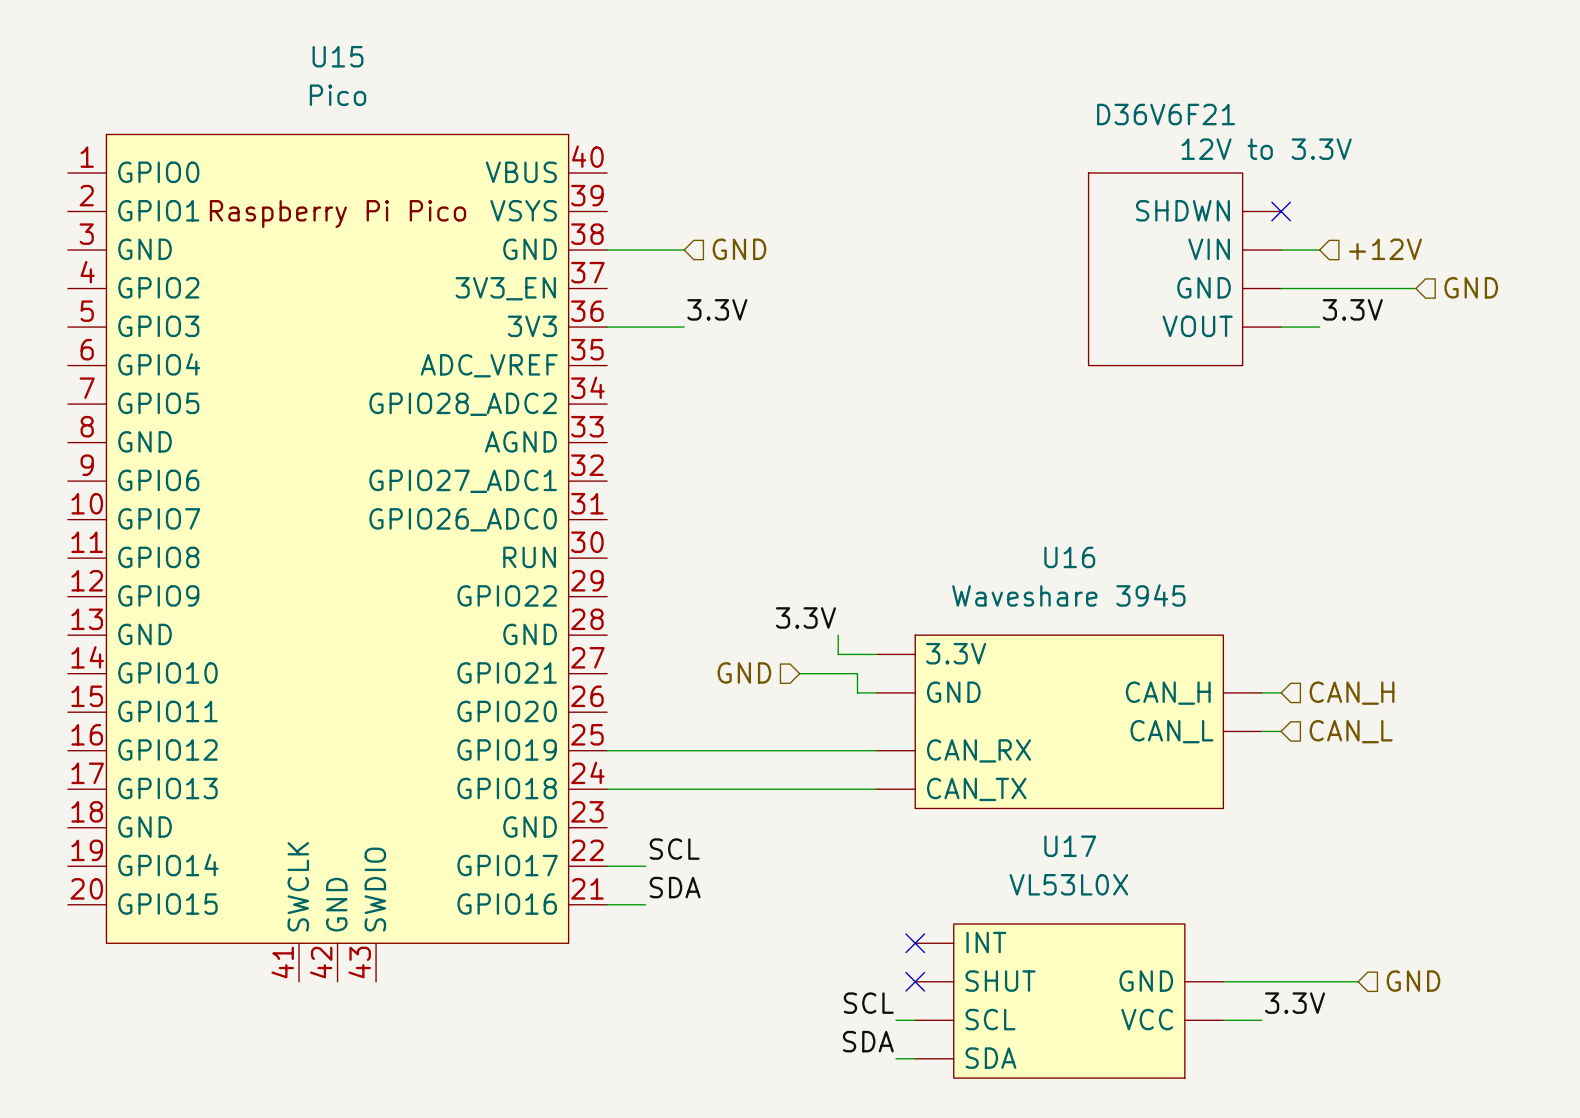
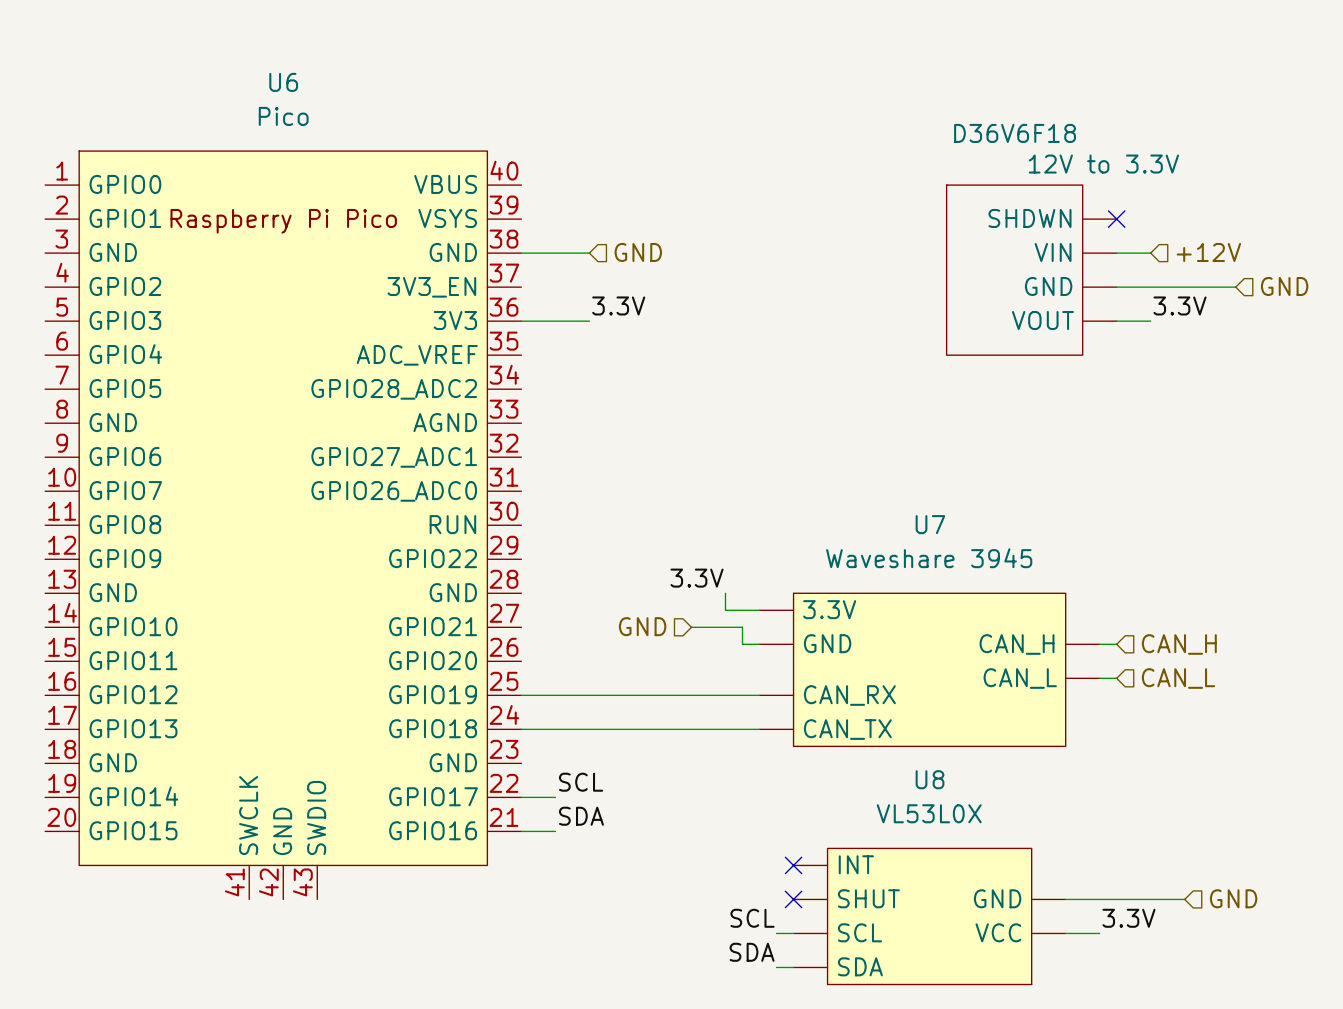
U15 name: U15 (337, 56) -> U6 (283, 82)
D36V6F21 name: D36V6F21 (1166, 114) -> D36V6F18 (1015, 133)
U16 name: U16 (1069, 557) -> U7 (930, 524)
U17 name: U17 (1070, 846) -> U8 (930, 779)

